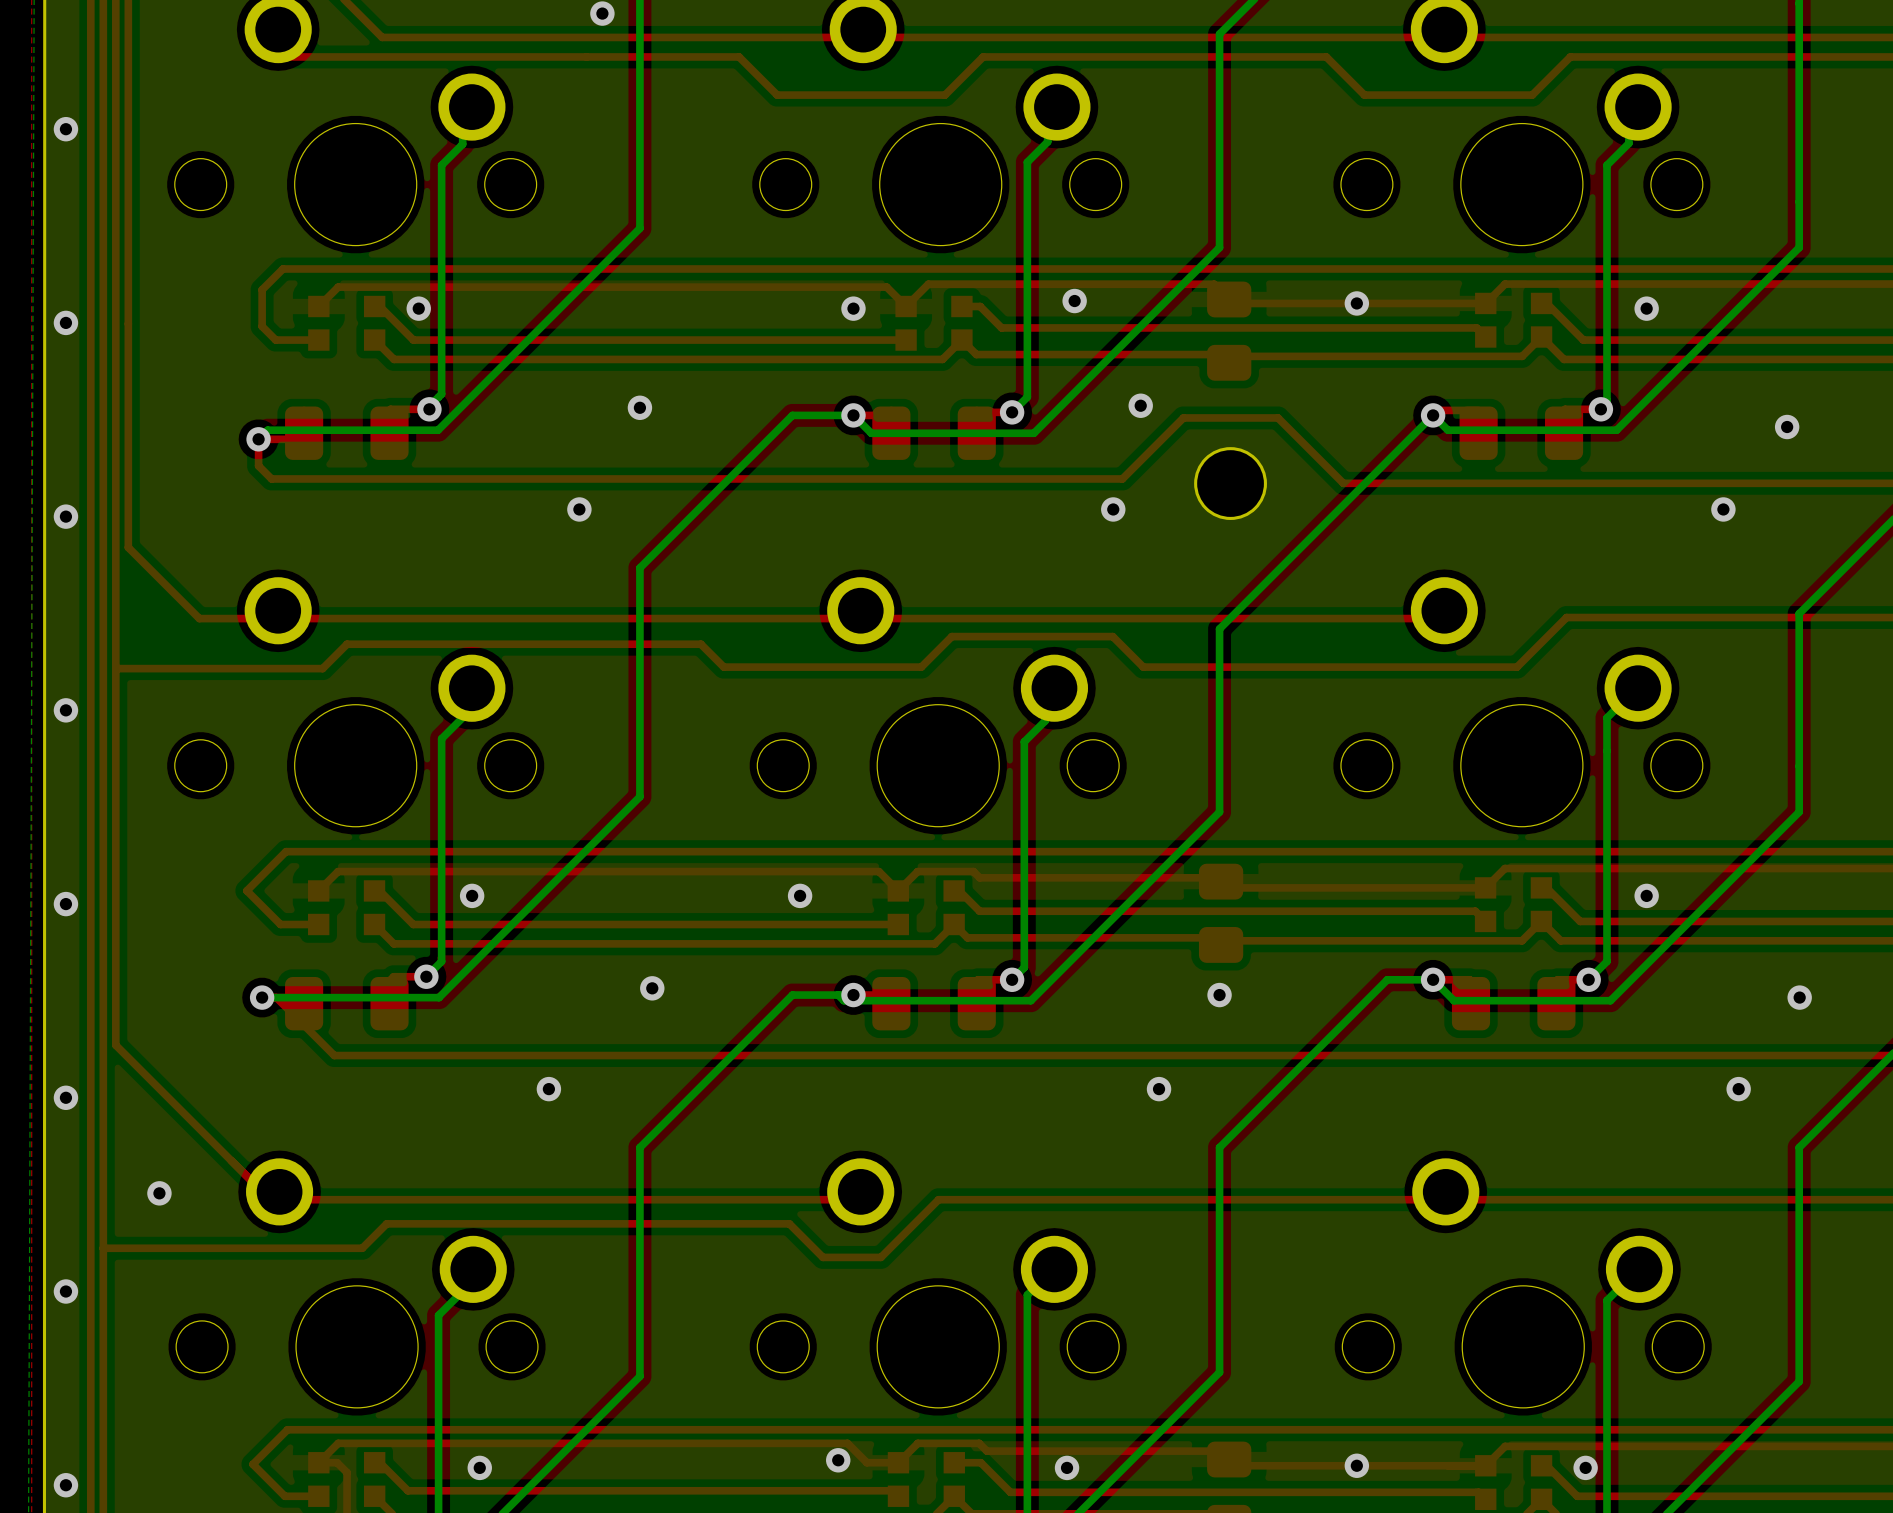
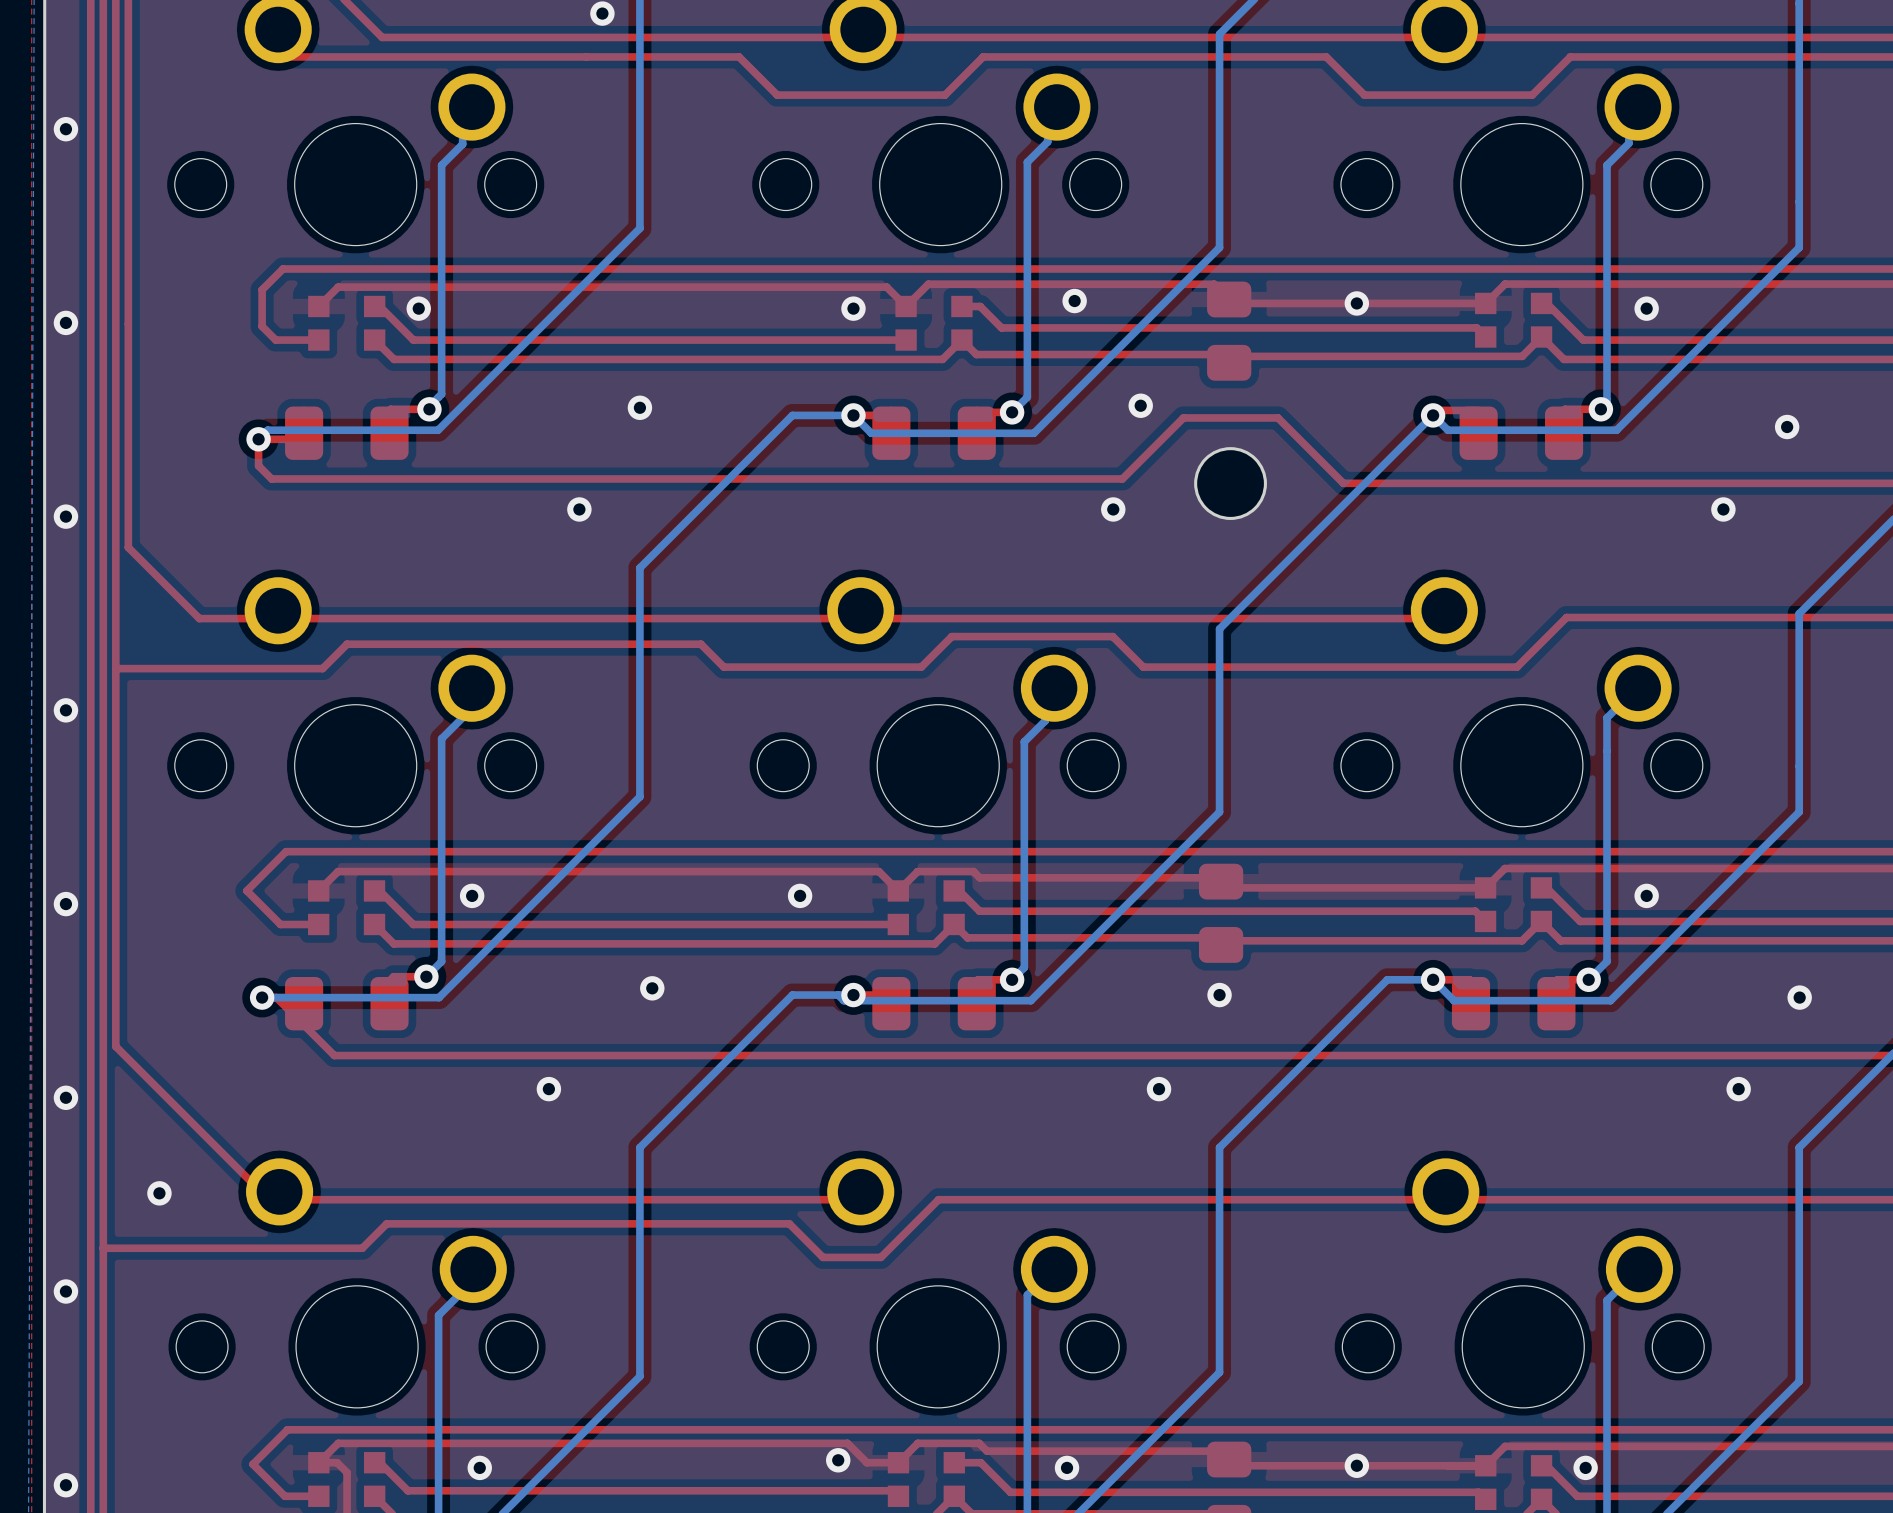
top track: (115, 1045) (270, 1199) -> (115, 1045) (261, 1191) (279, 1191)

